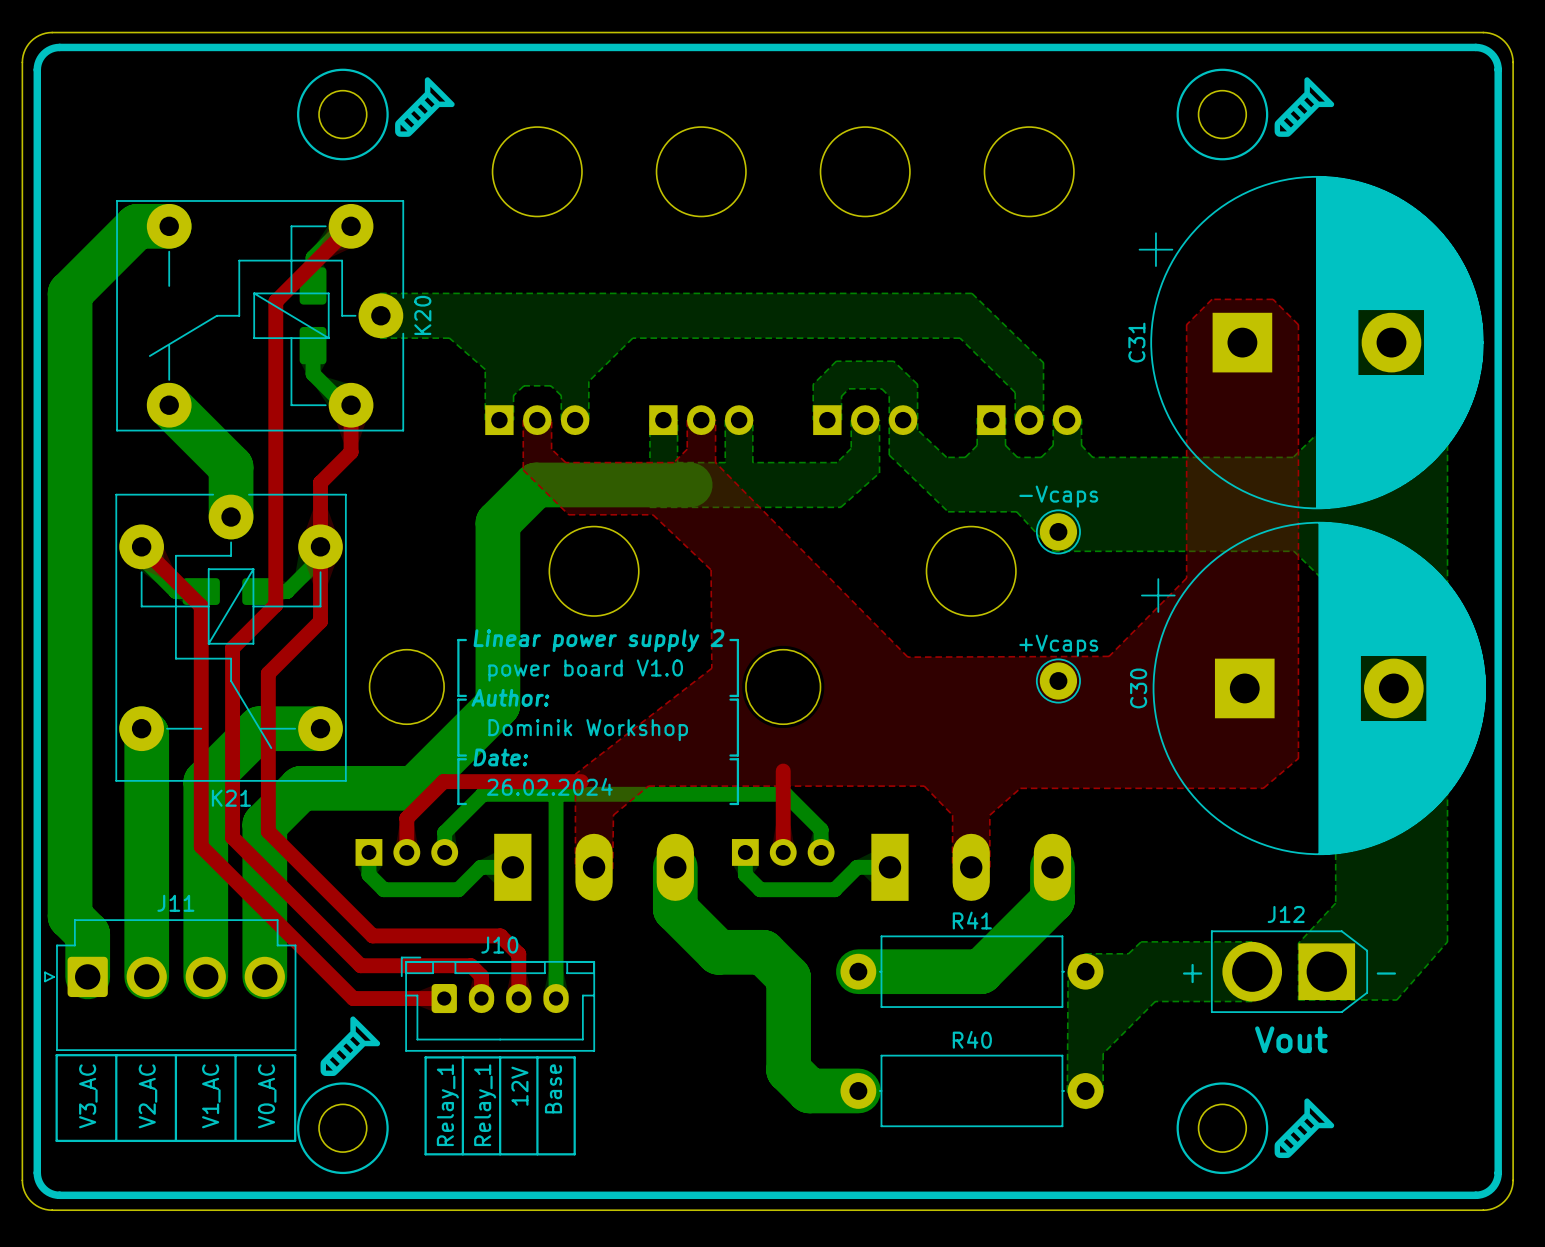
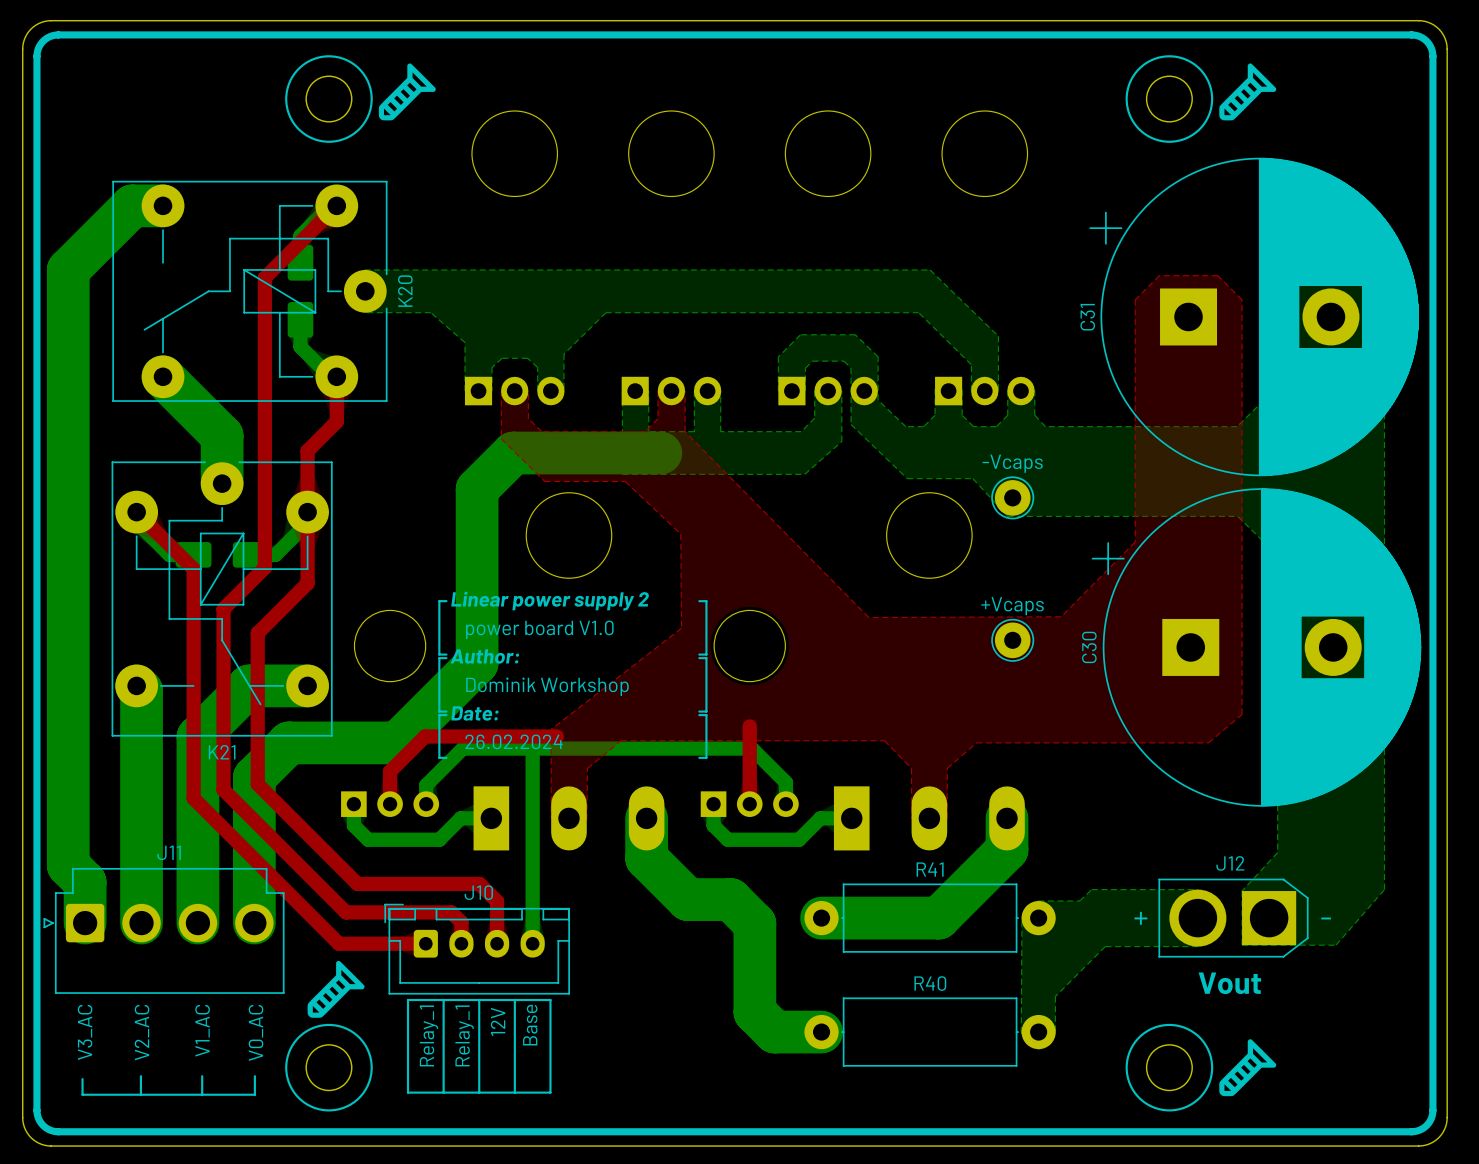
line: (56, 1055) (295, 1055) (295, 1140) (56, 1140) (56, 1055) -> none
line: (116, 1055) (116, 1139) -> none
line: (175, 1055) (175, 1140) -> none
line: (235, 1055) (235, 1139) -> none
line: none -> (140, 1076) (140, 1094)
line: none -> (202, 1076) (202, 1094)
line: none -> (254, 1076) (254, 1094) (82, 1094) (82, 1079)

